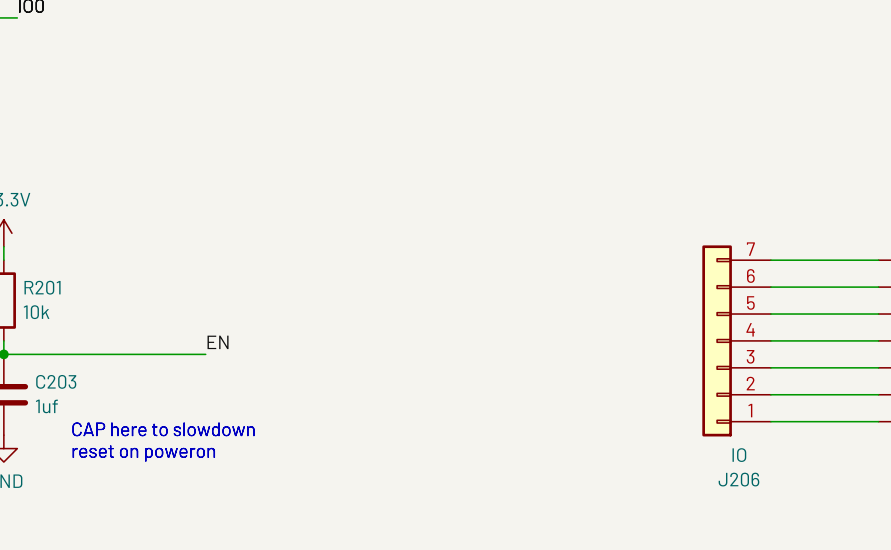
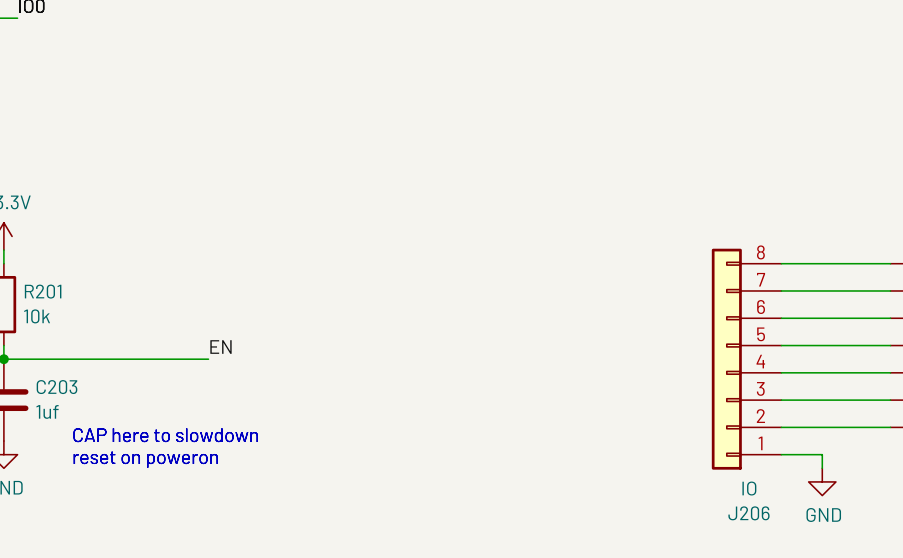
J206 symbol: [702, 245, 771, 437] -> [711, 248, 782, 470]
wire: none -> (781, 454) (822, 454) (822, 468)
power symbol: none -> GND (822, 481)

